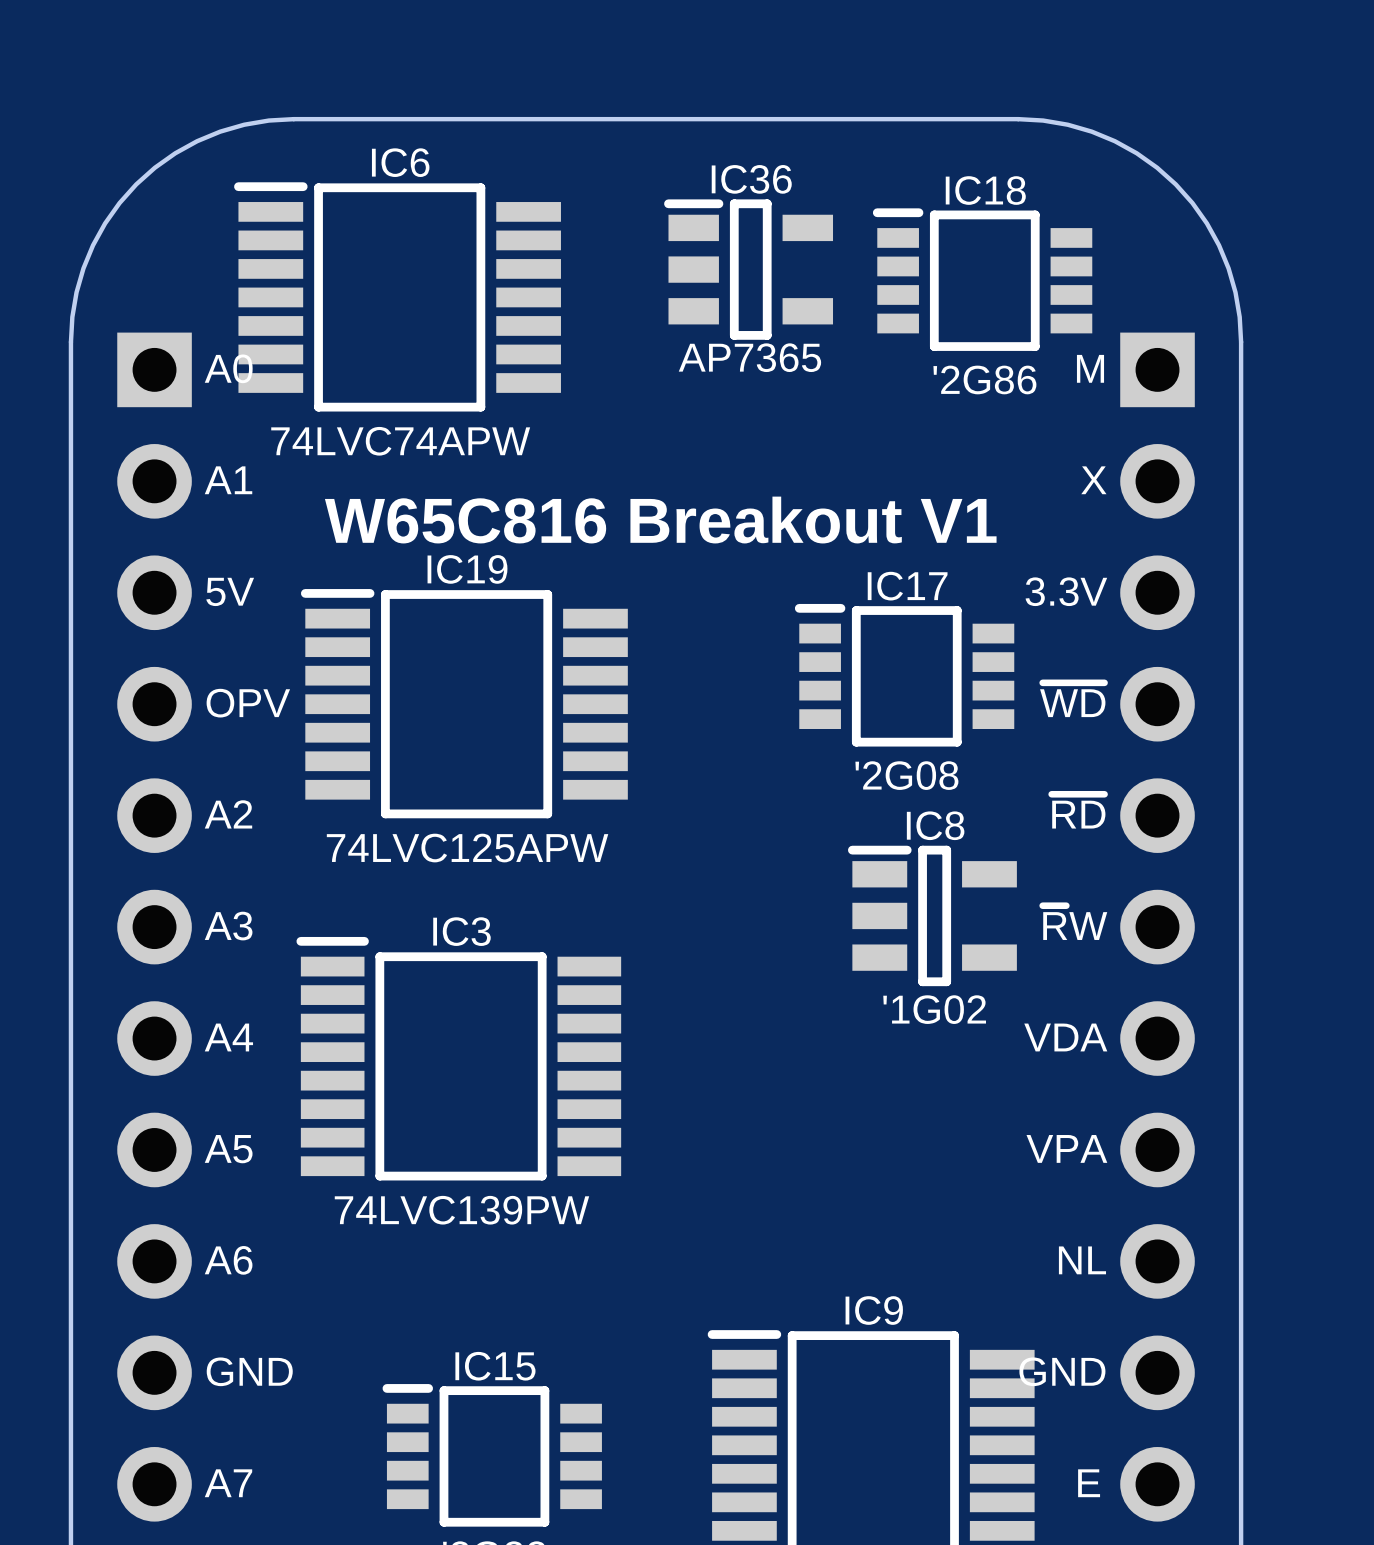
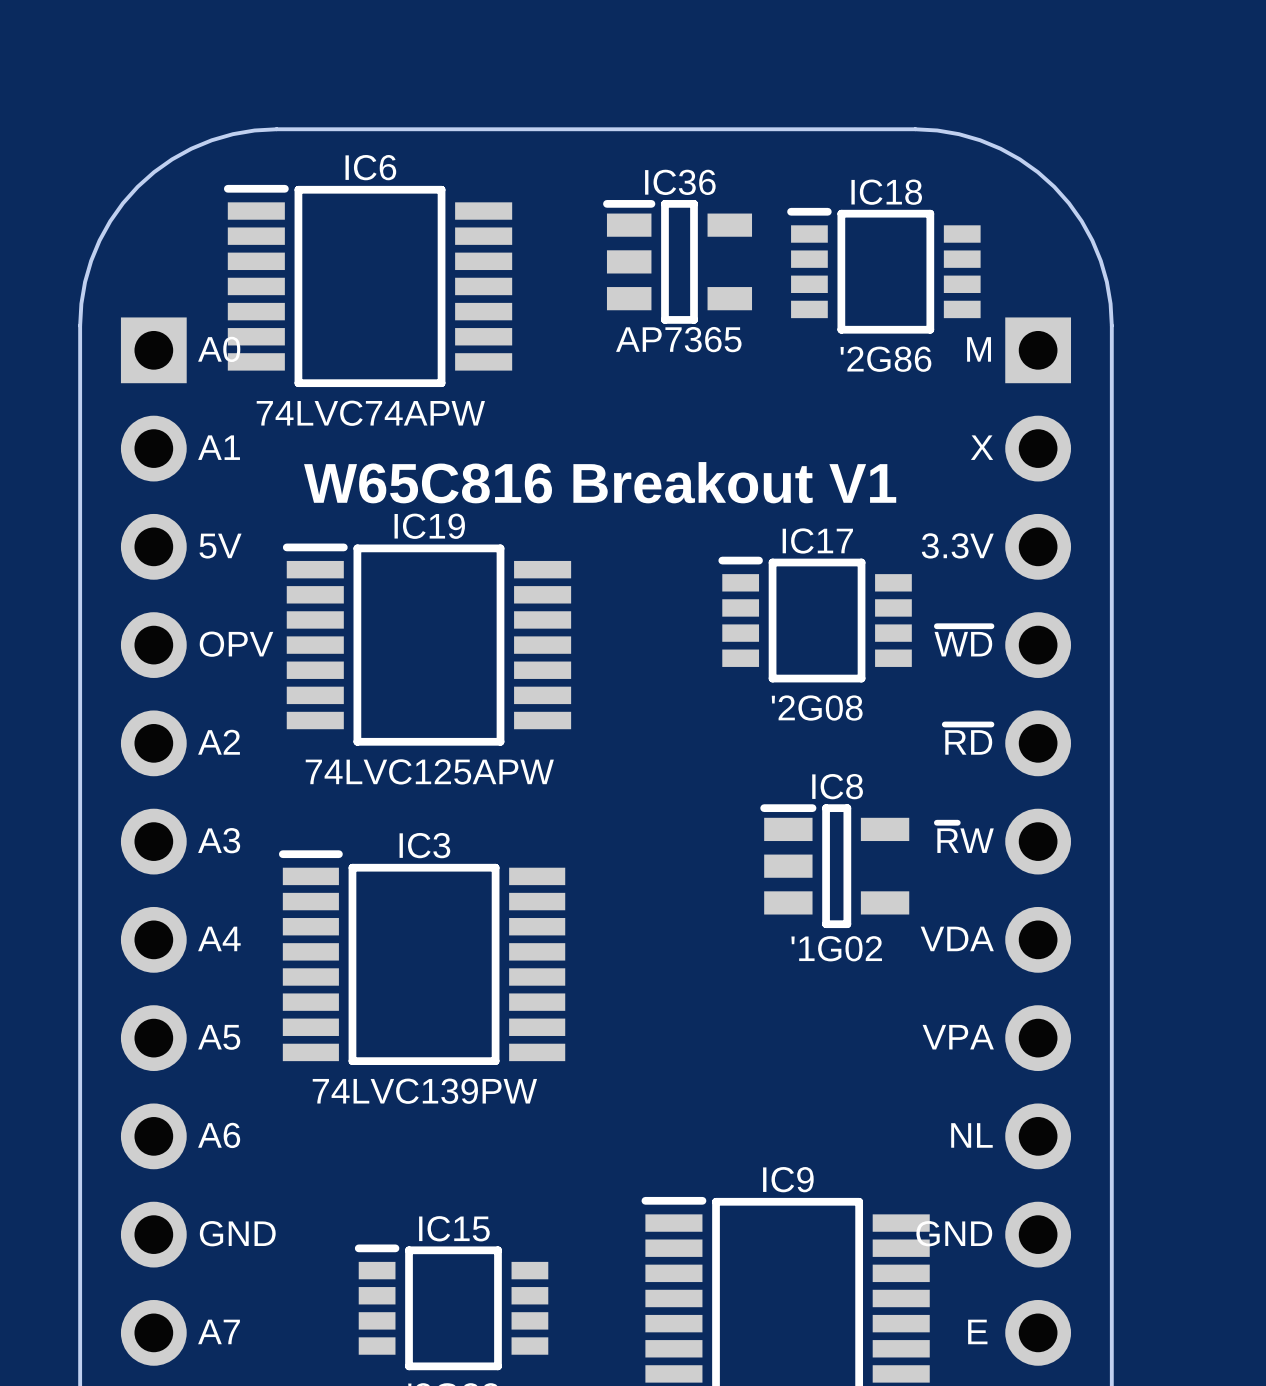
IC8 position: (932, 915) -> (834, 866)

